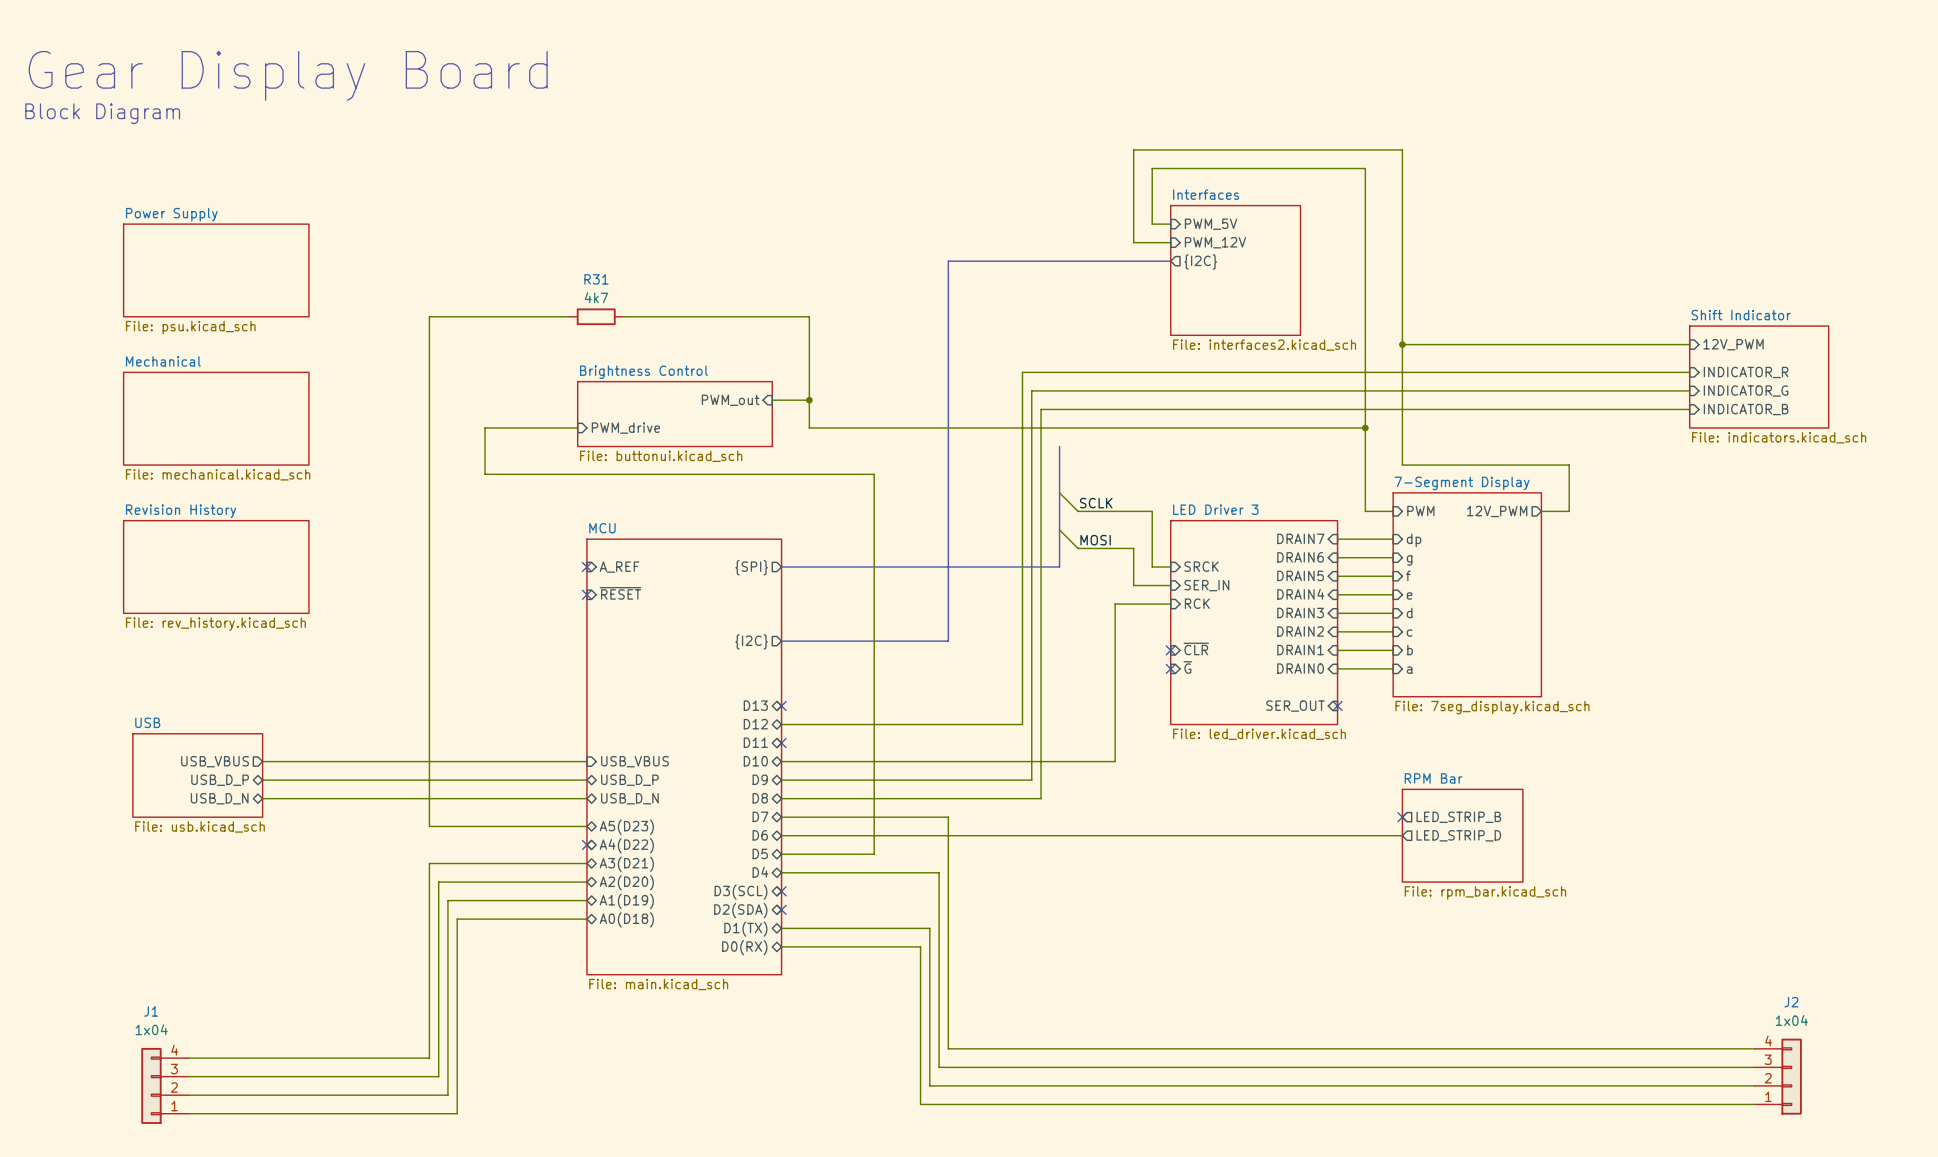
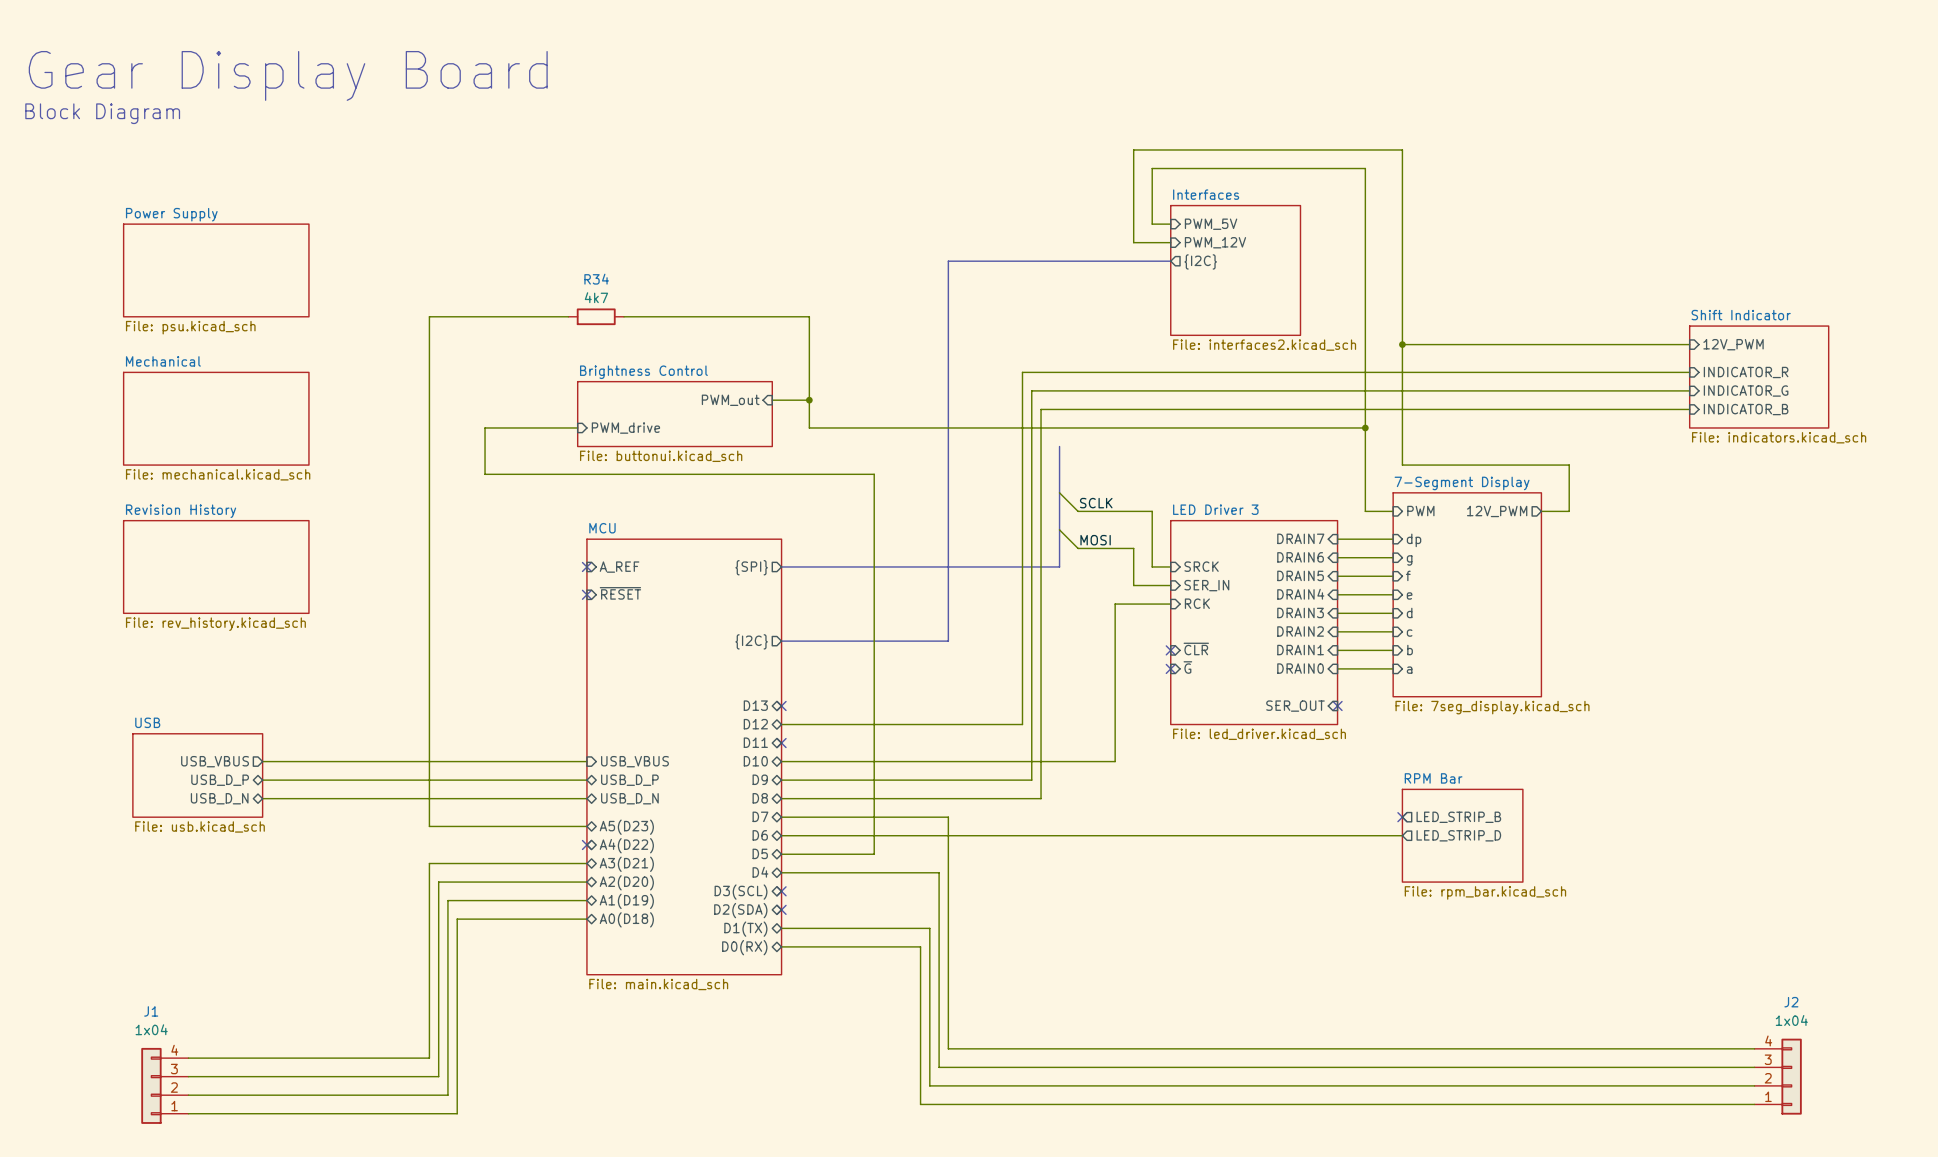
R31 name: R31 (596, 279) -> R34 (596, 279)

